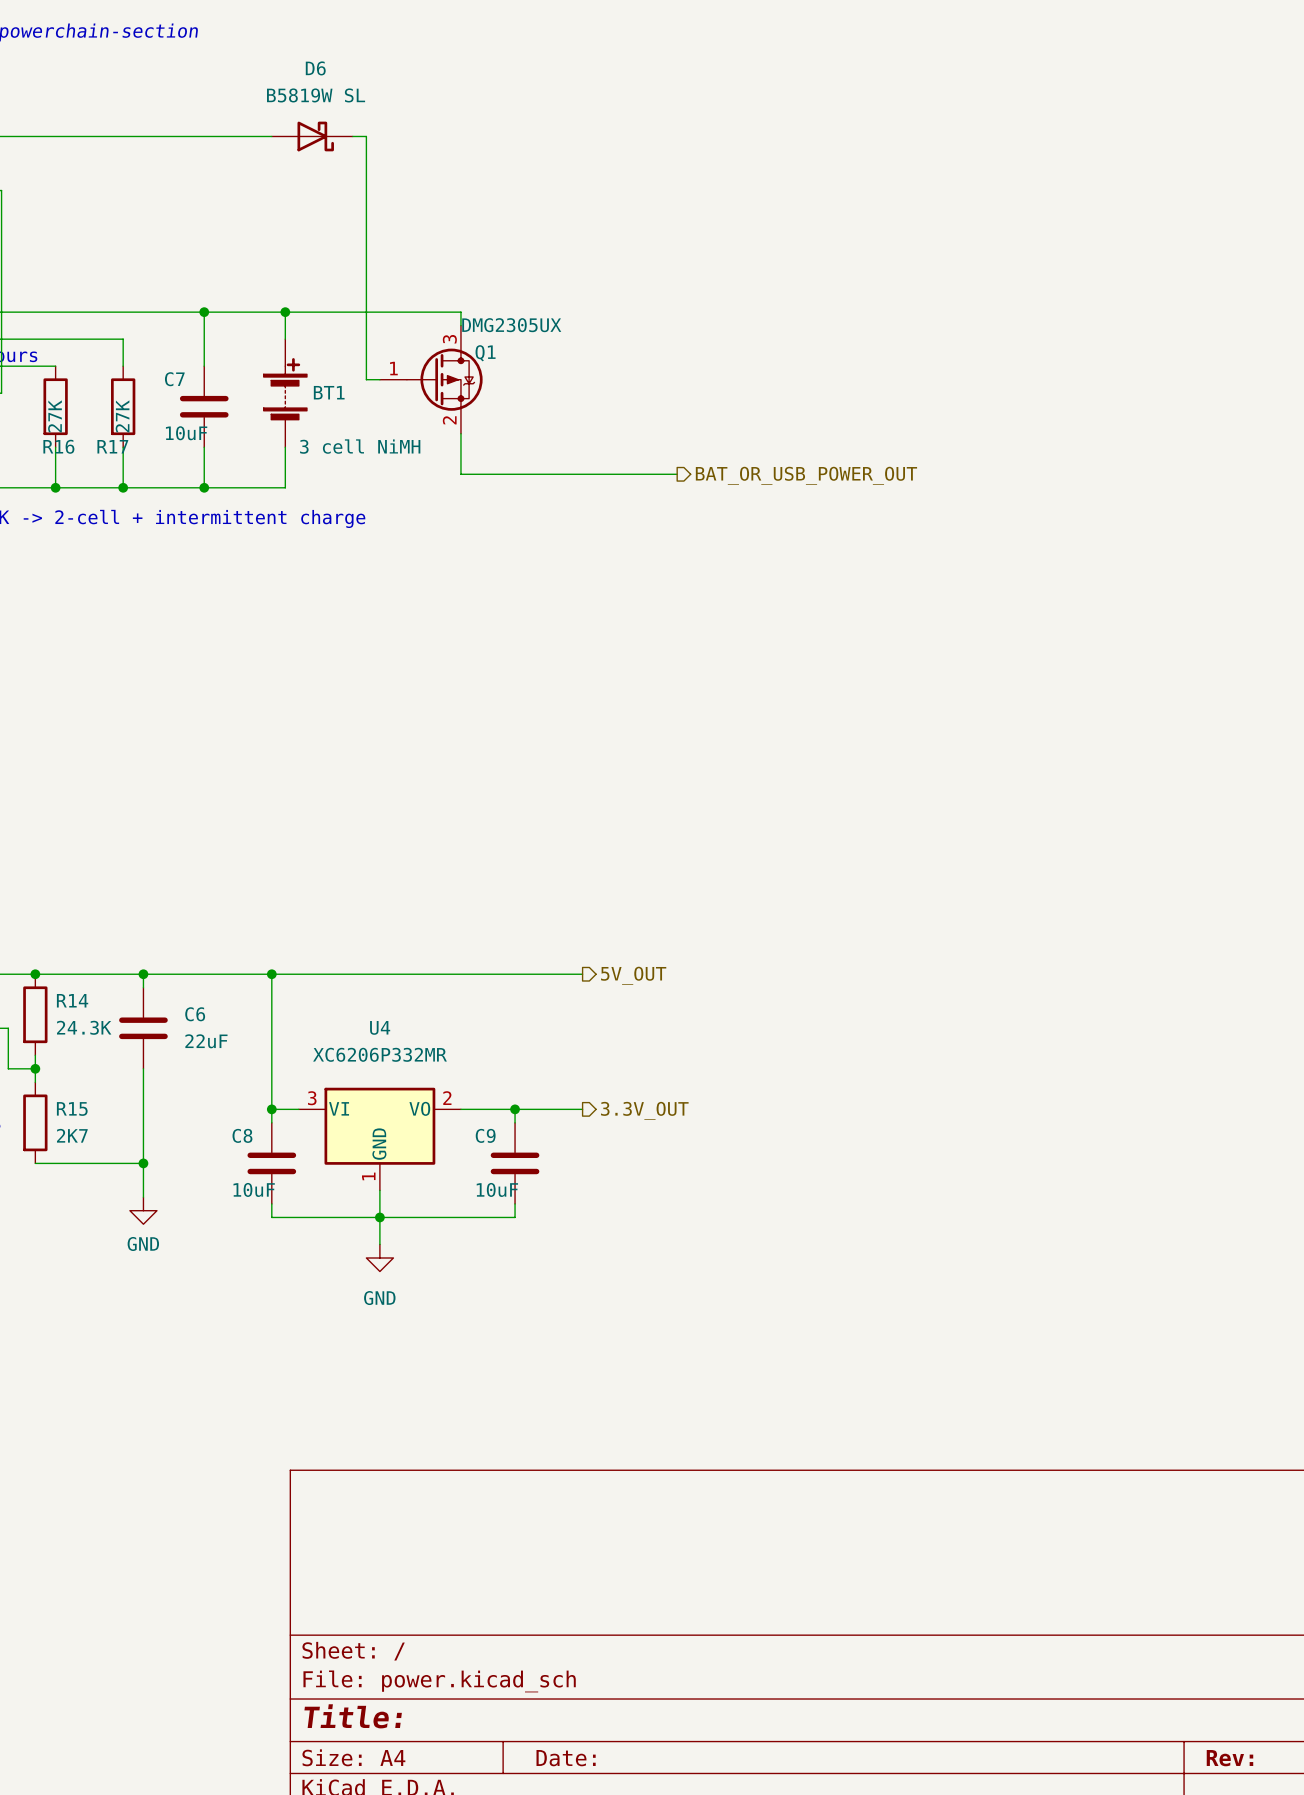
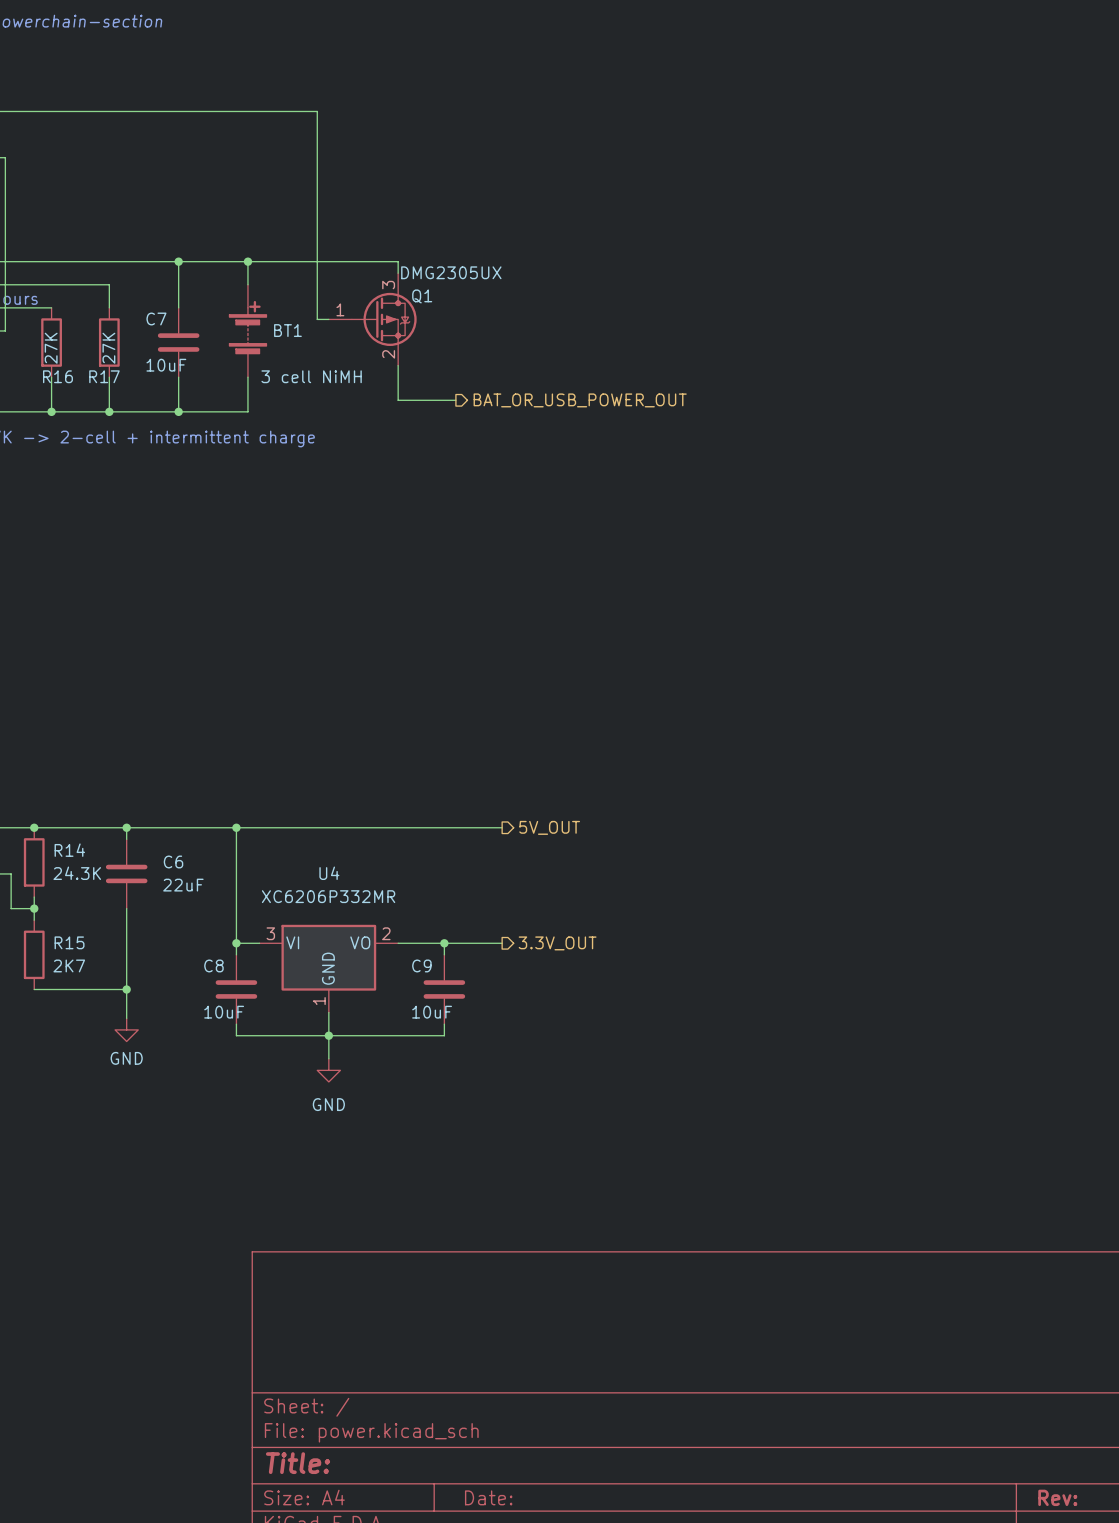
D6: B5819W SL (312, 136) -> none
wire: (528, 474) (677, 474) -> none
hierarchical label position: BAT_OR_USB_POWER_OUT (806, 475) -> BAT_OR_USB_POWER_OUT (580, 400)

